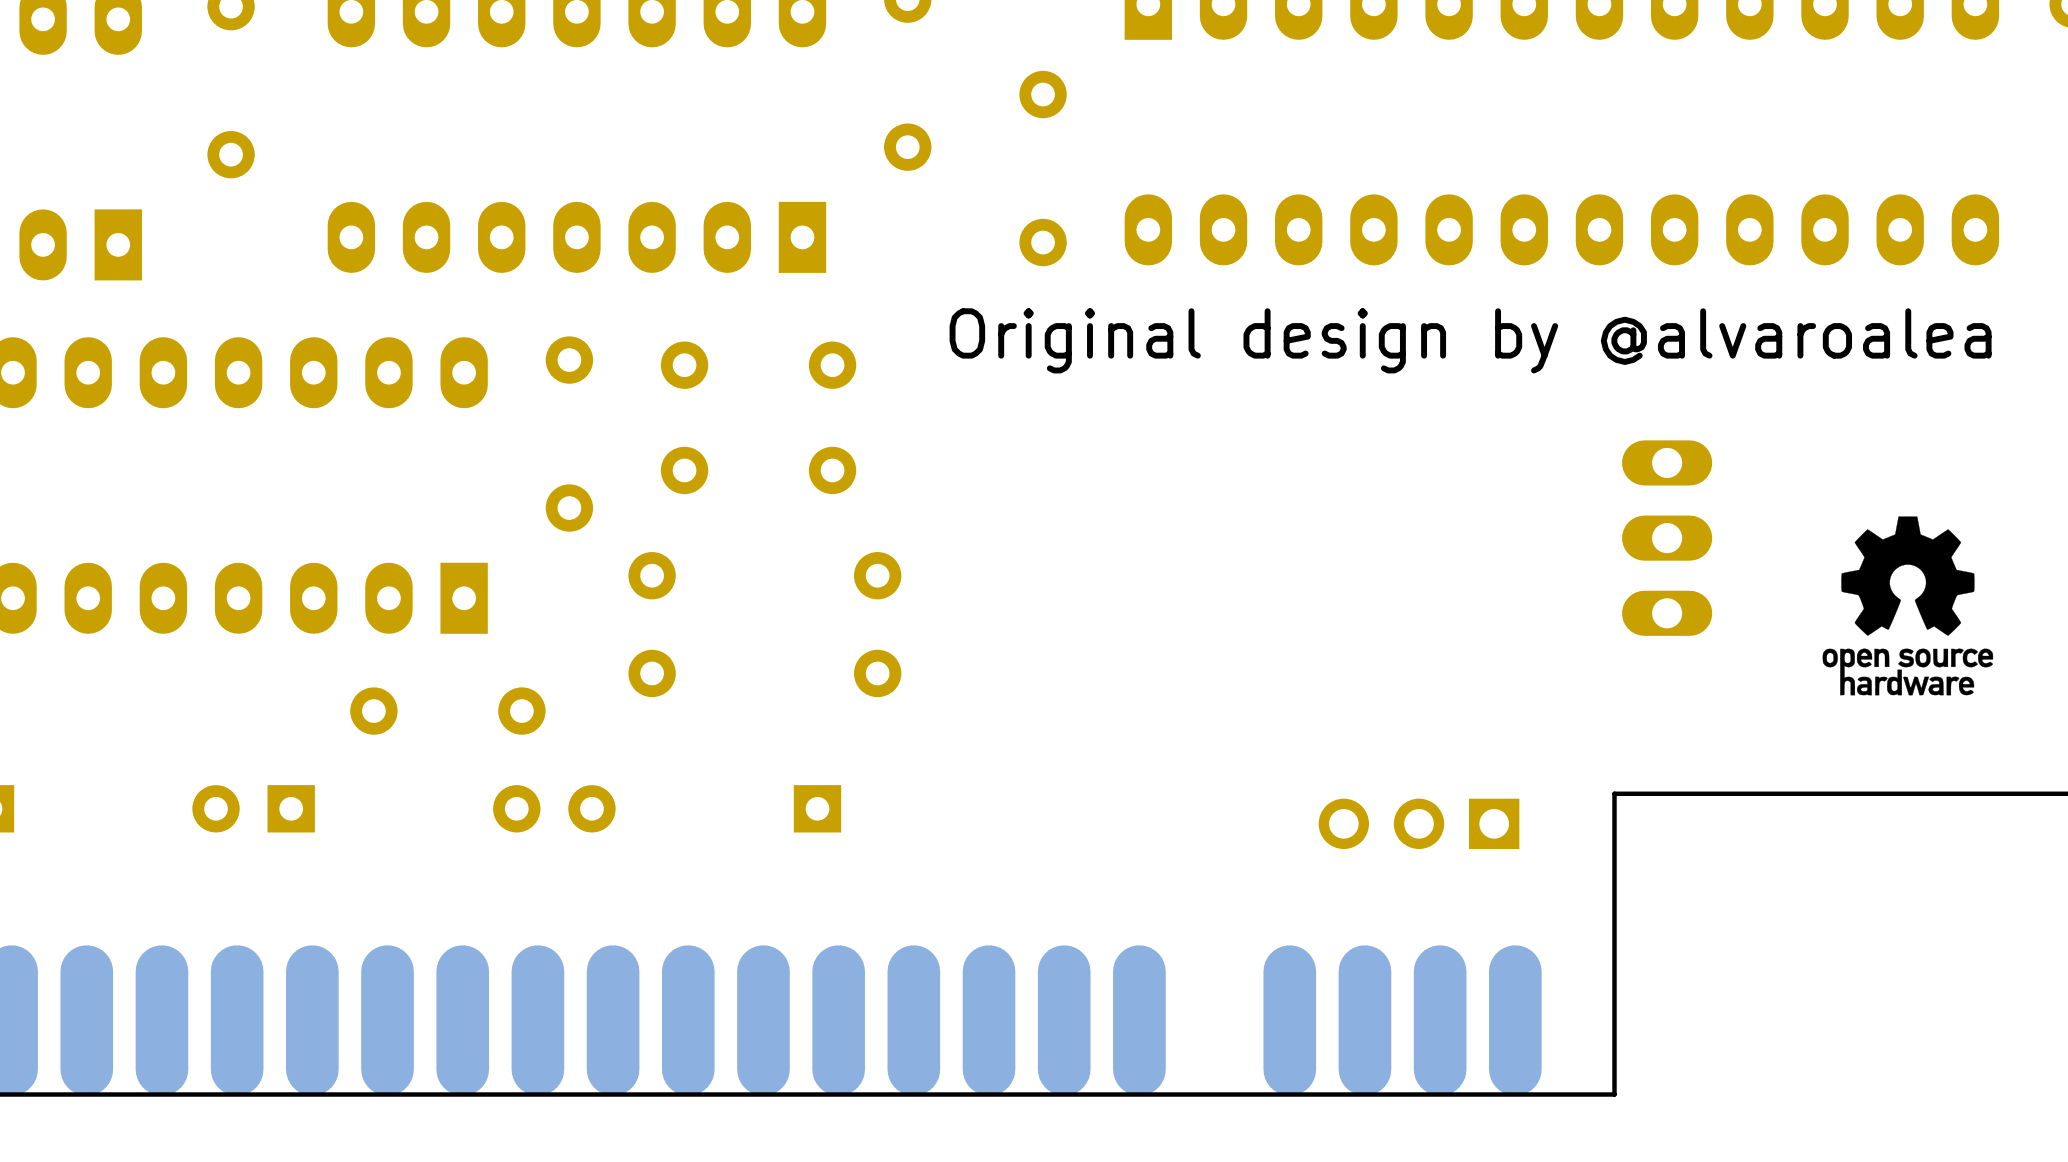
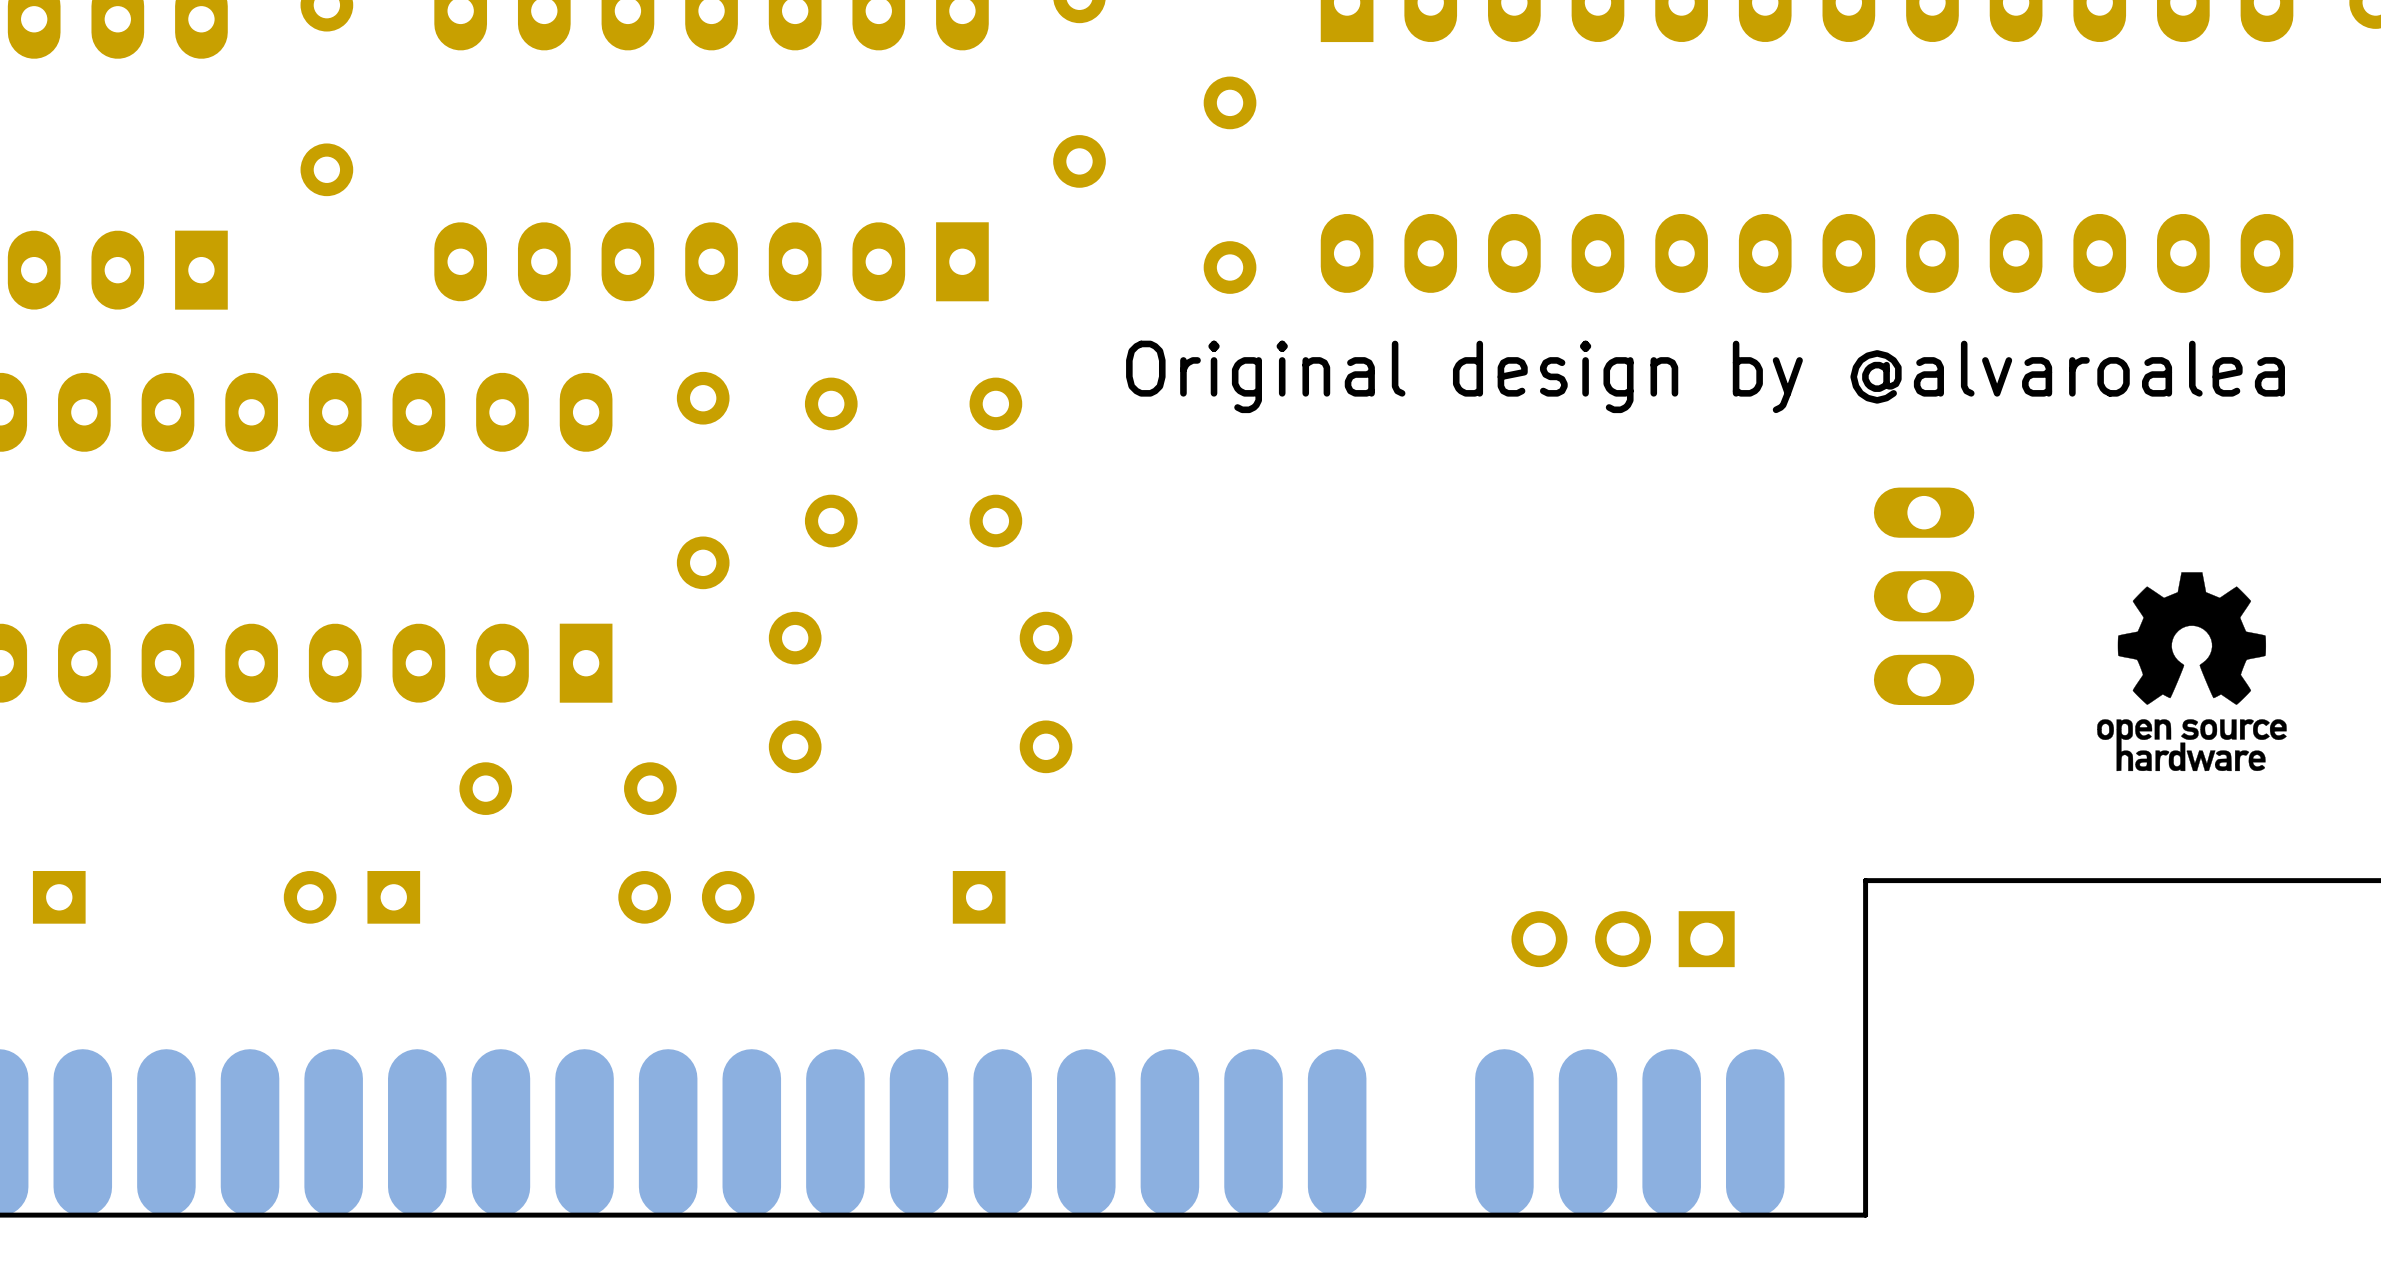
part position: (1419, 823) -> (1623, 939)

